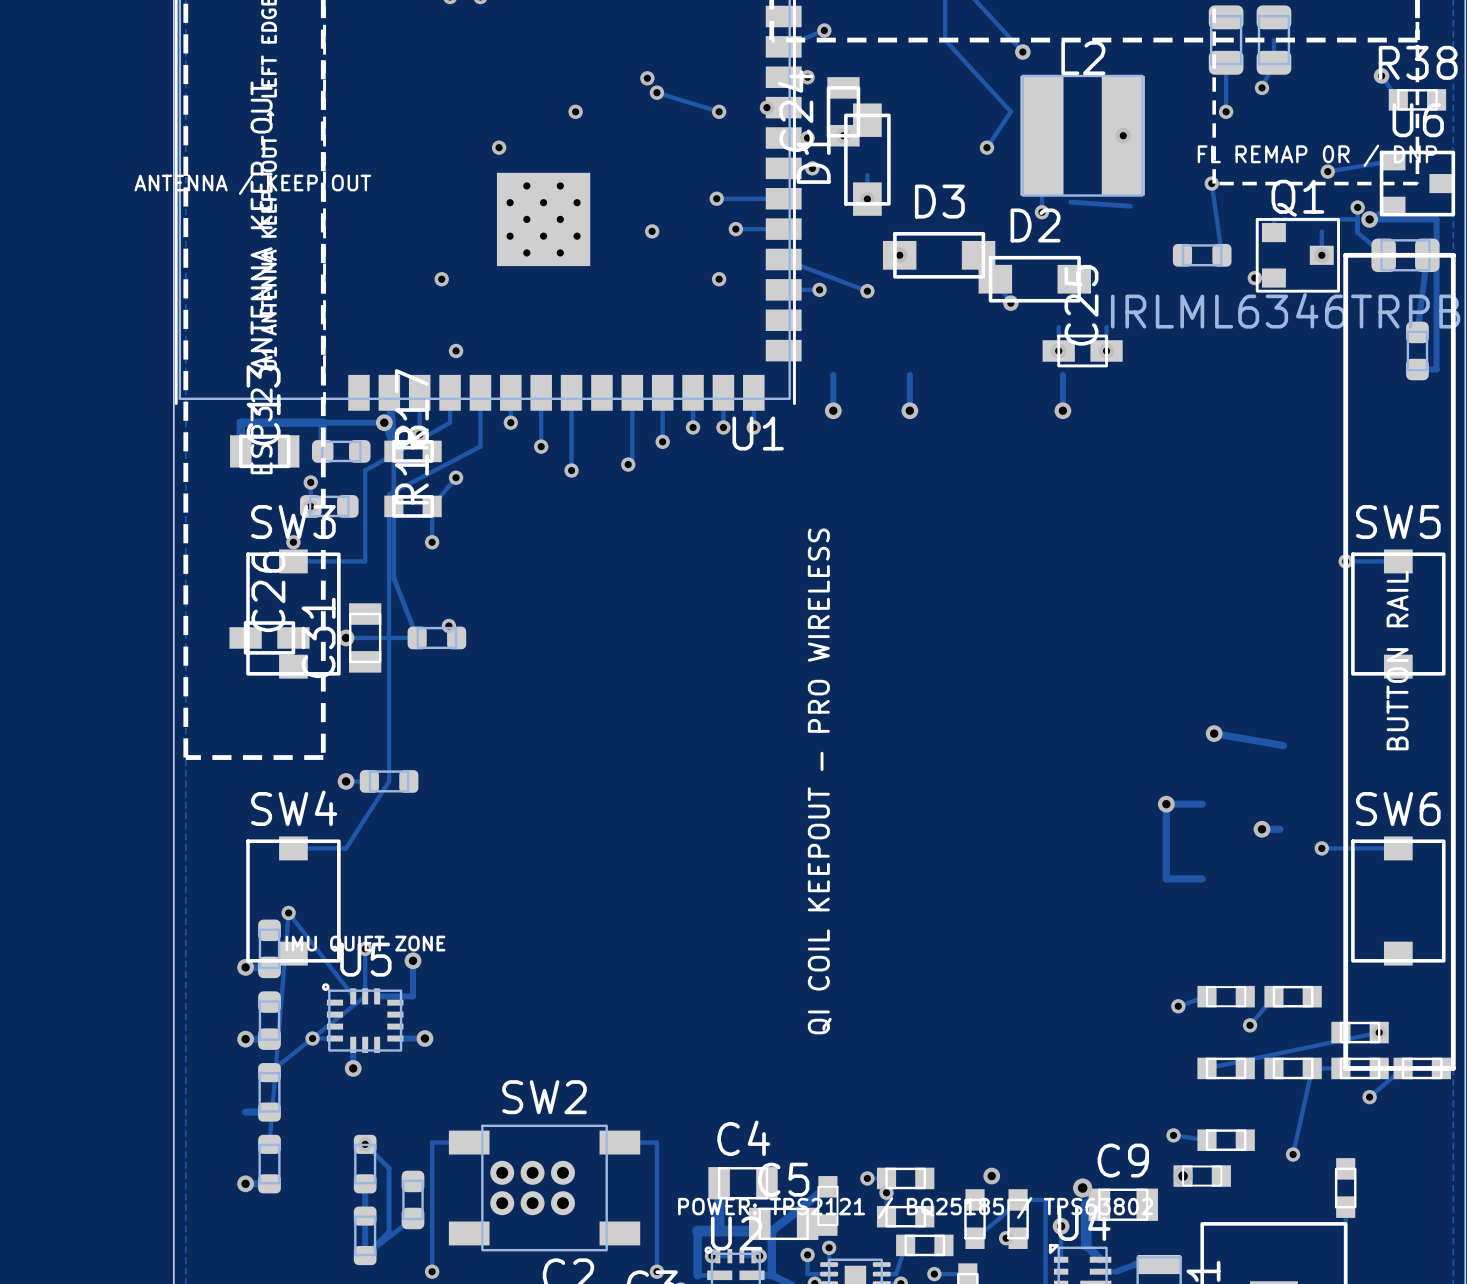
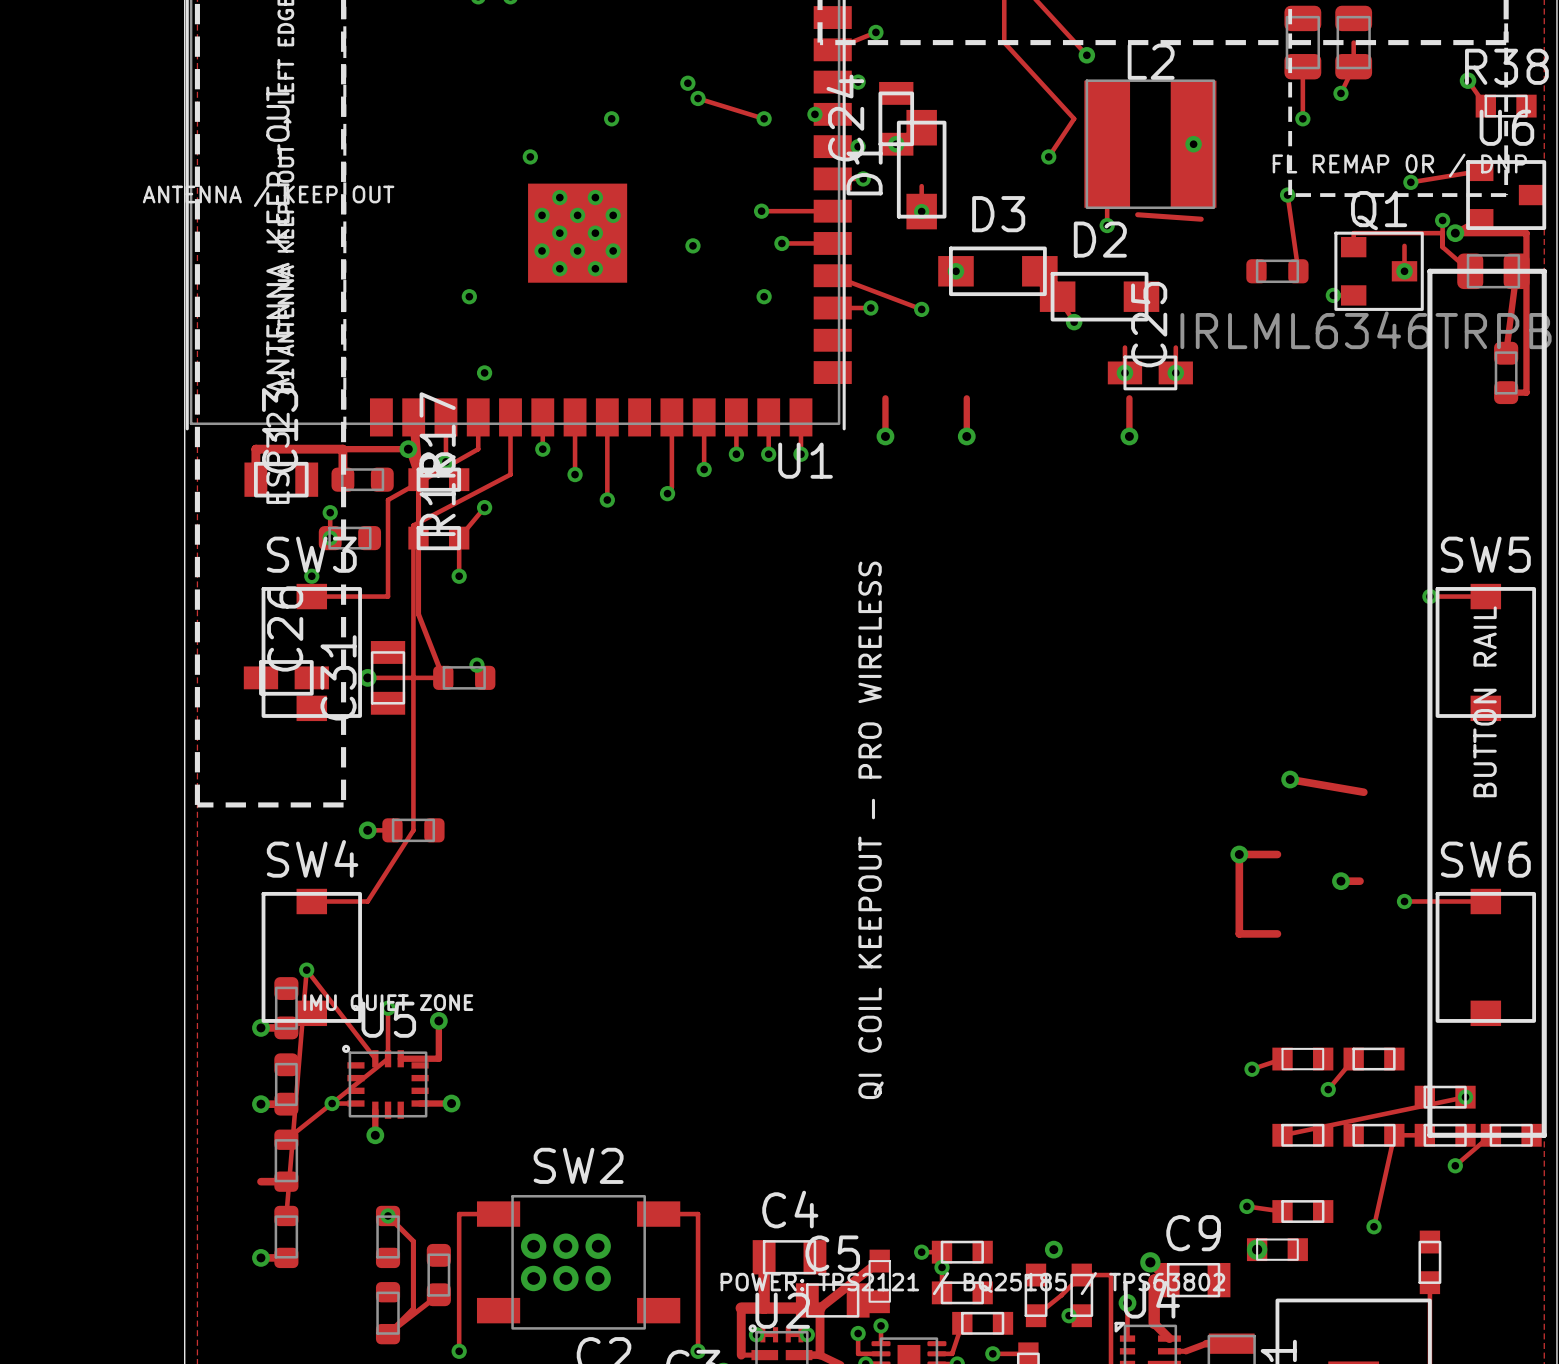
track: (365, 1183) (365, 1255) -> none

